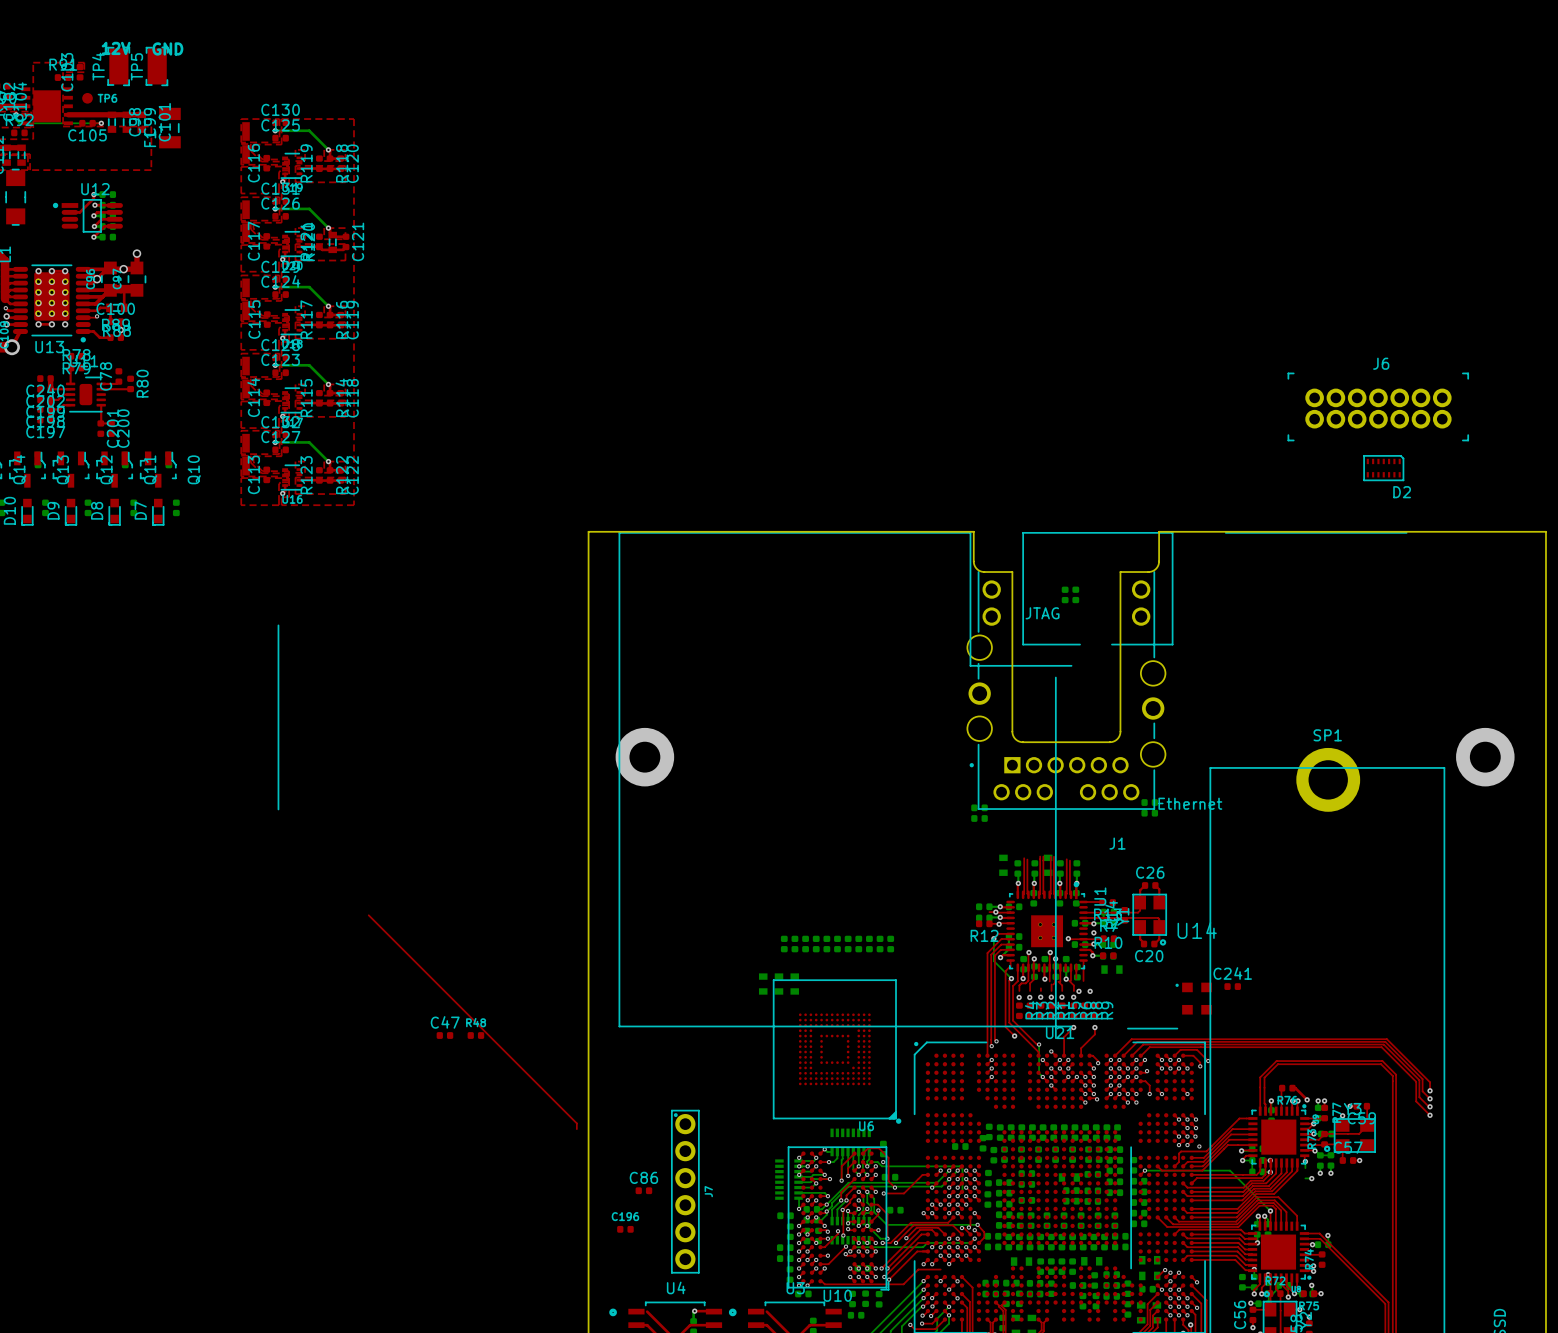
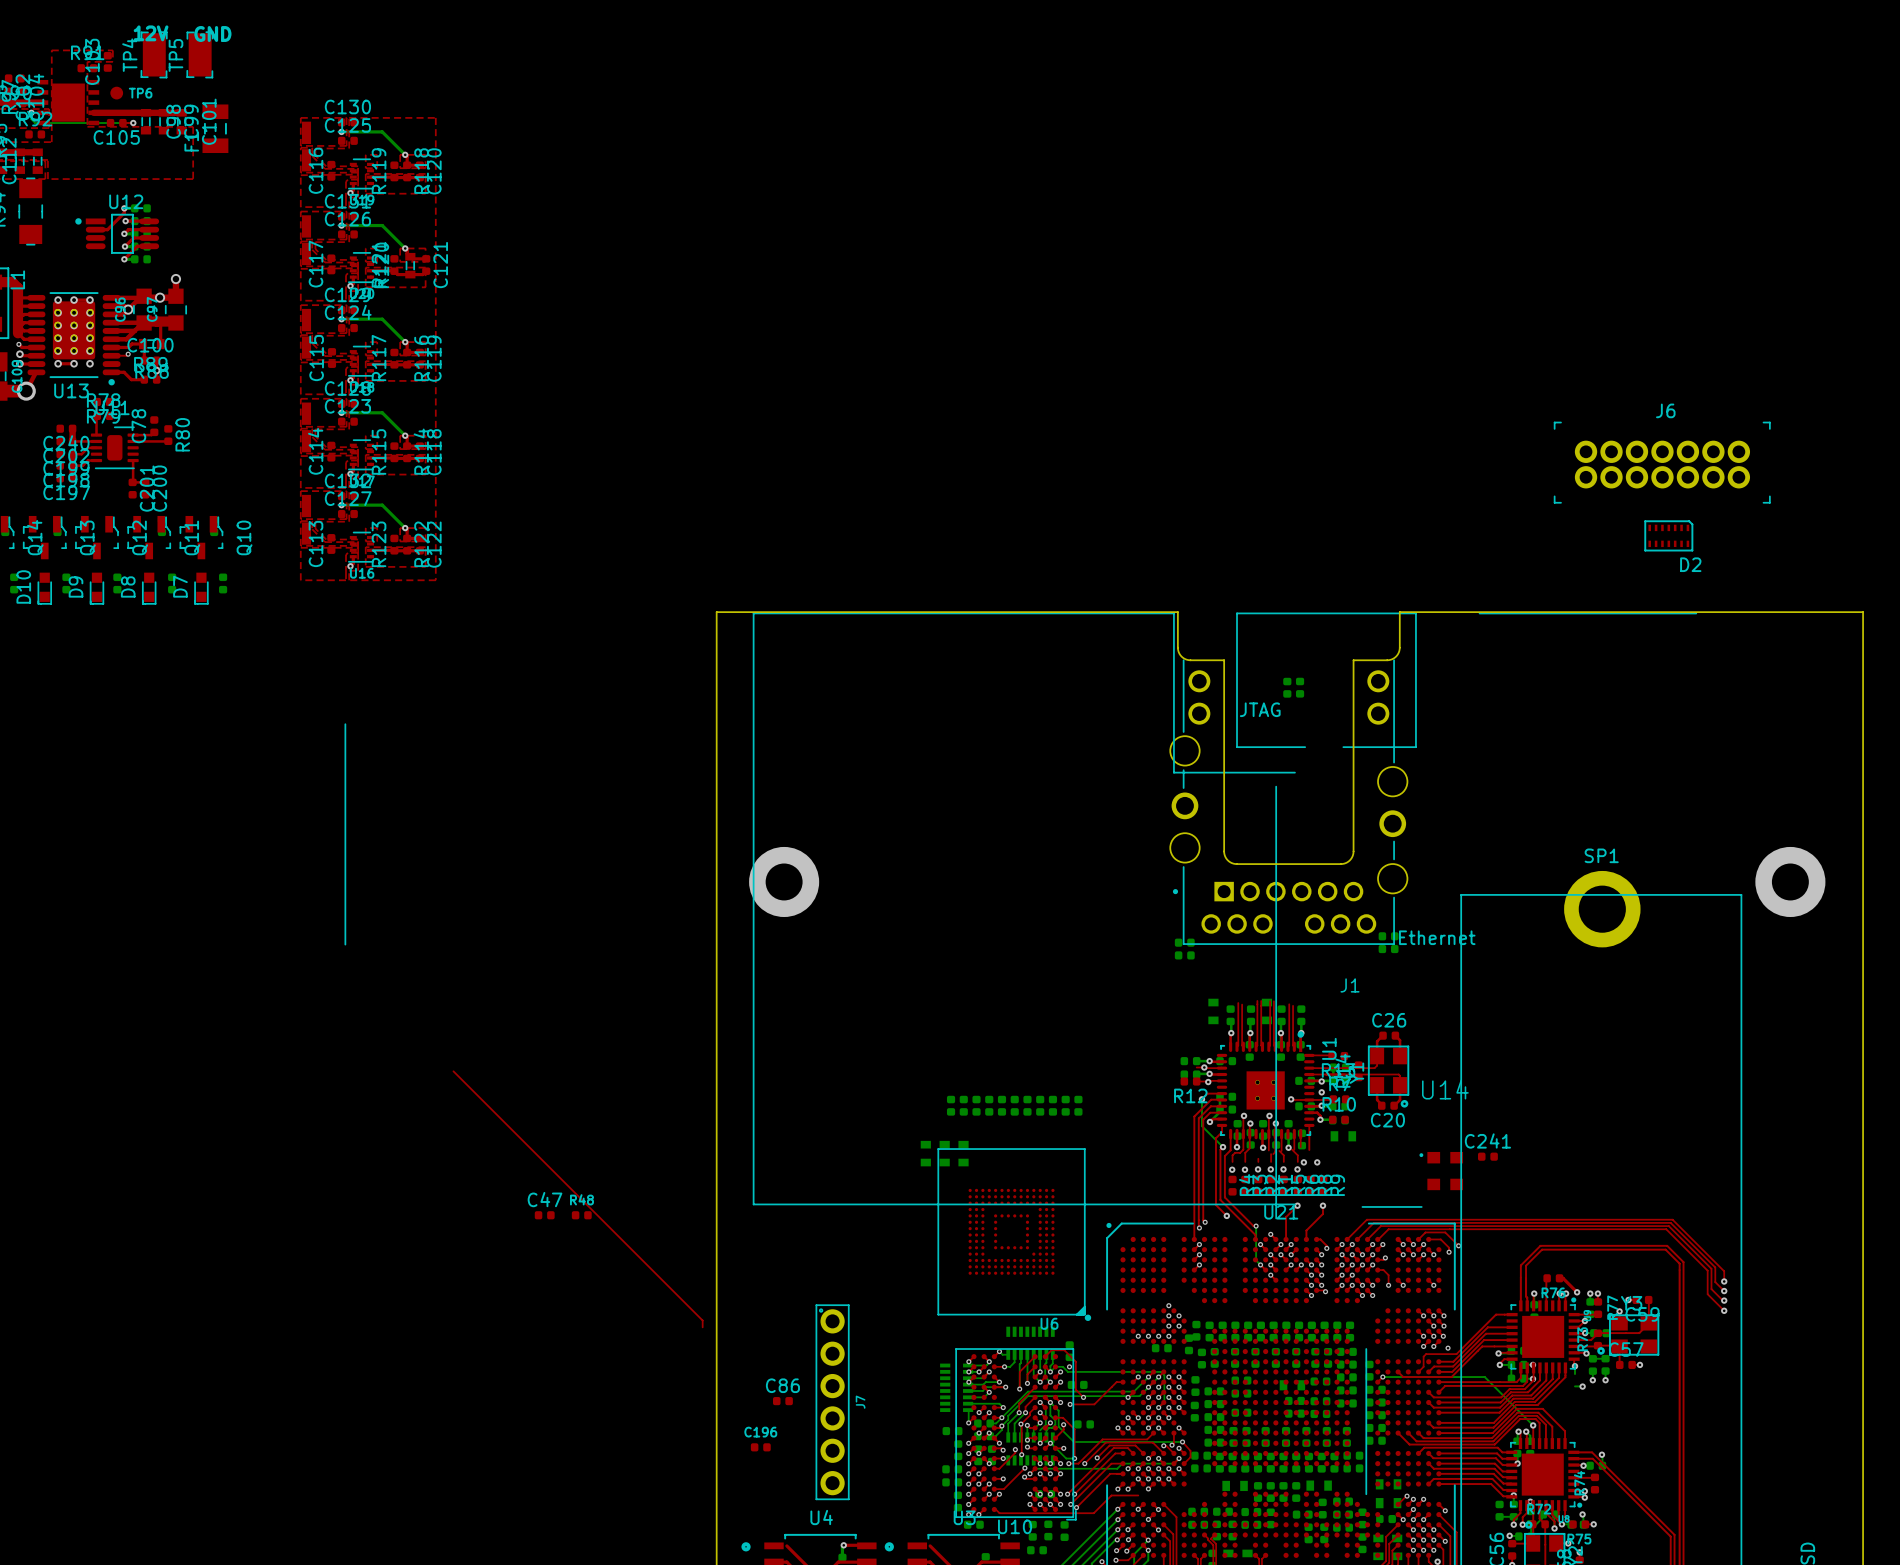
via: none -> (1168, 1305)
via: none -> (1168, 1315)
via: none -> (1179, 1315)
via: none -> (1168, 1326)
via: none -> (1179, 1326)
via: none -> (1138, 1336)
via: none -> (1148, 1336)
via: none -> (1158, 1336)
via: none -> (1168, 1336)

